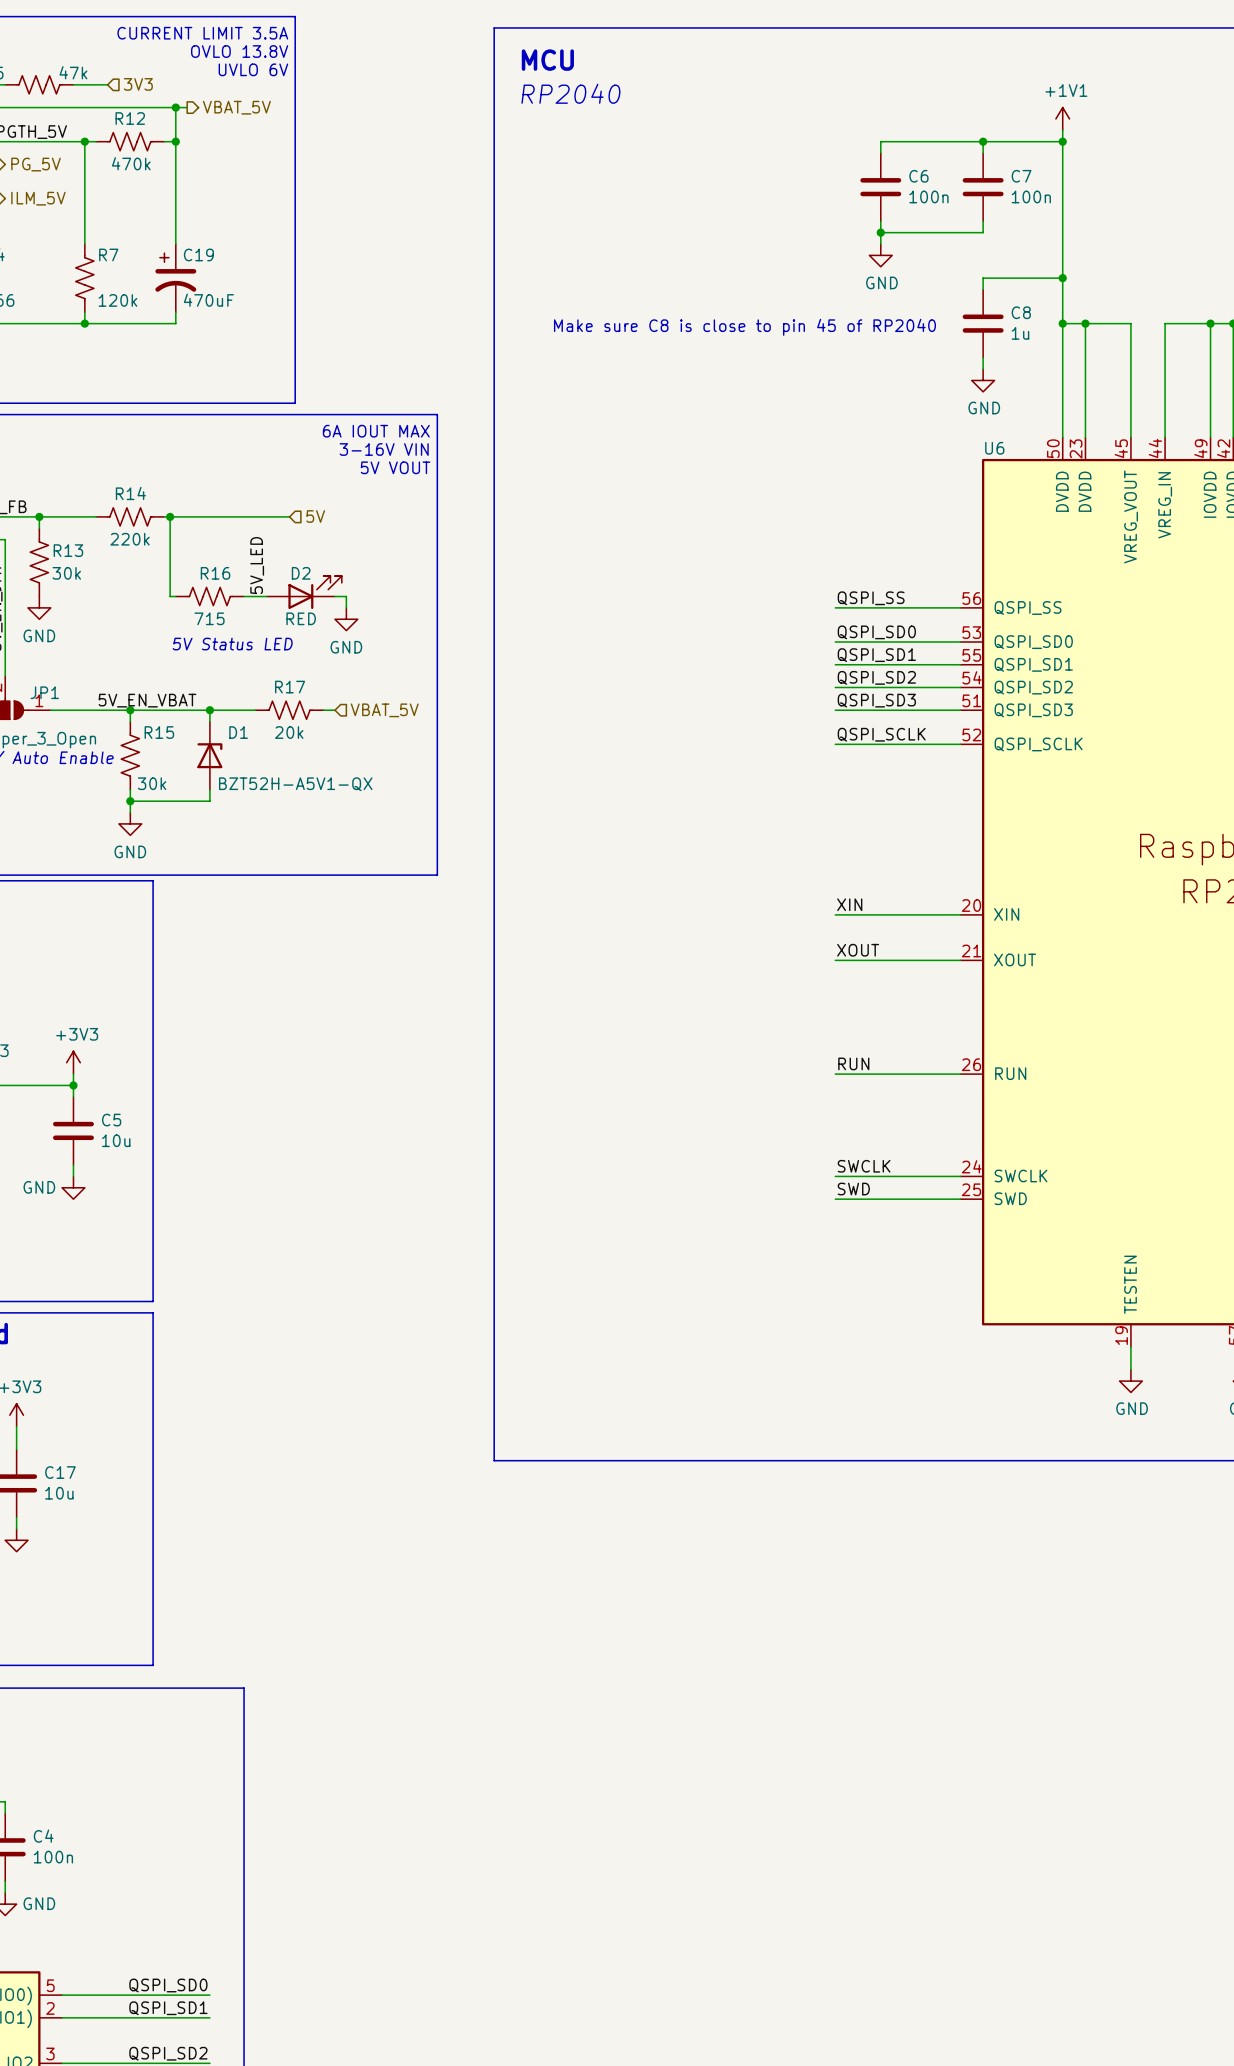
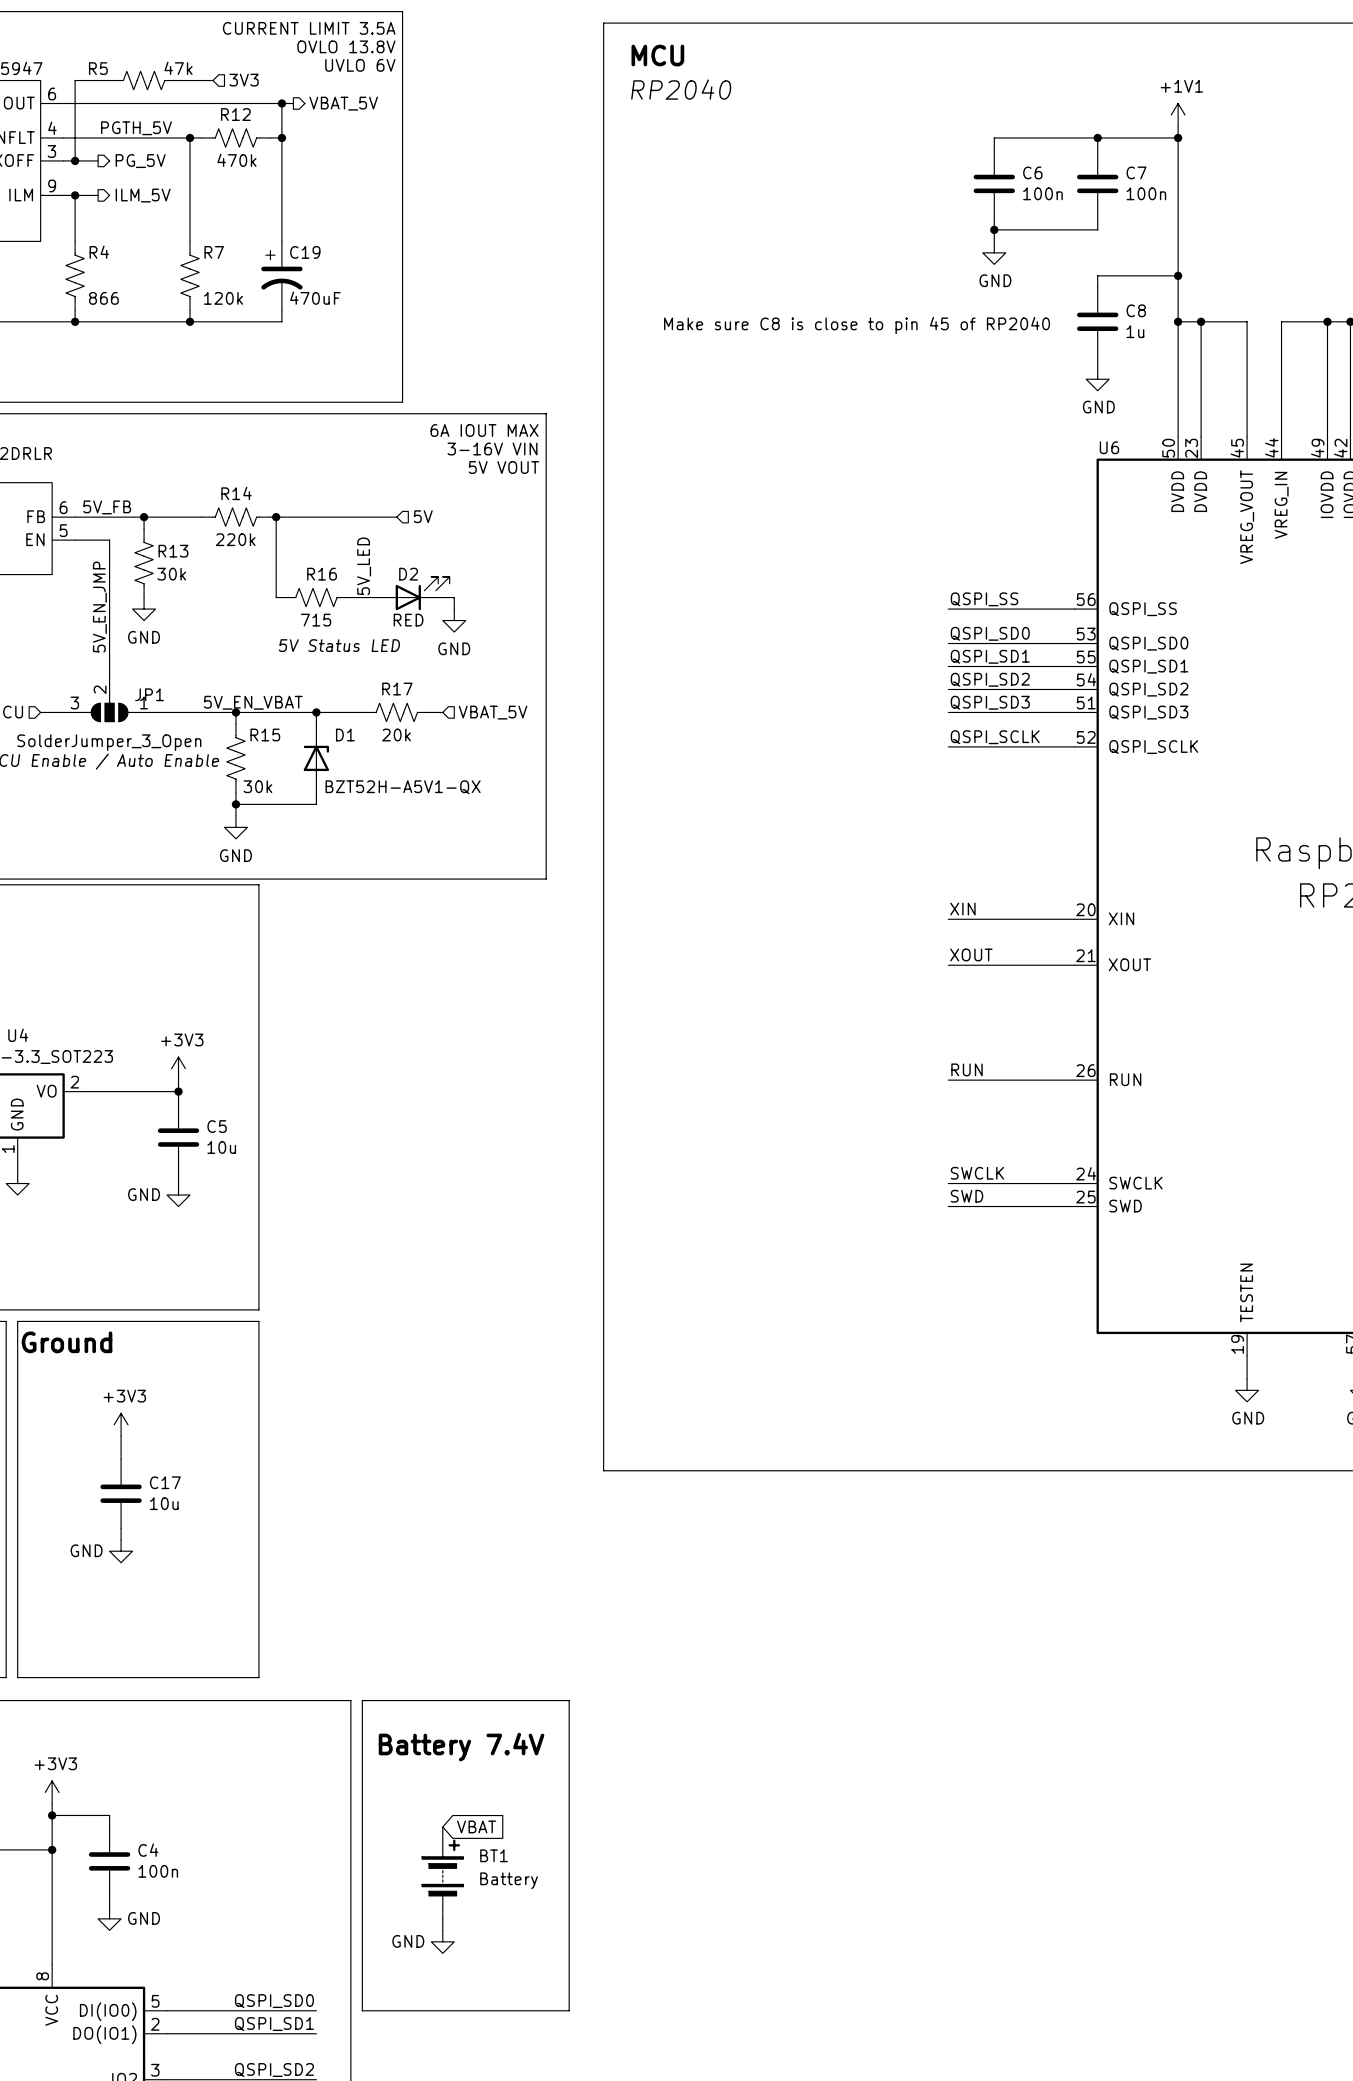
line: none -> (362, 1700) (569, 1700) (569, 2010) (362, 2010) (362, 1700)
text: none -> Battery 7.4V (461, 1747)
global label: none -> VBAT (476, 1826)
BT1: none -> Battery (442, 1872)
wire: none -> (442, 1918) (442, 1930)
power symbol: none -> GND (442, 1941)

